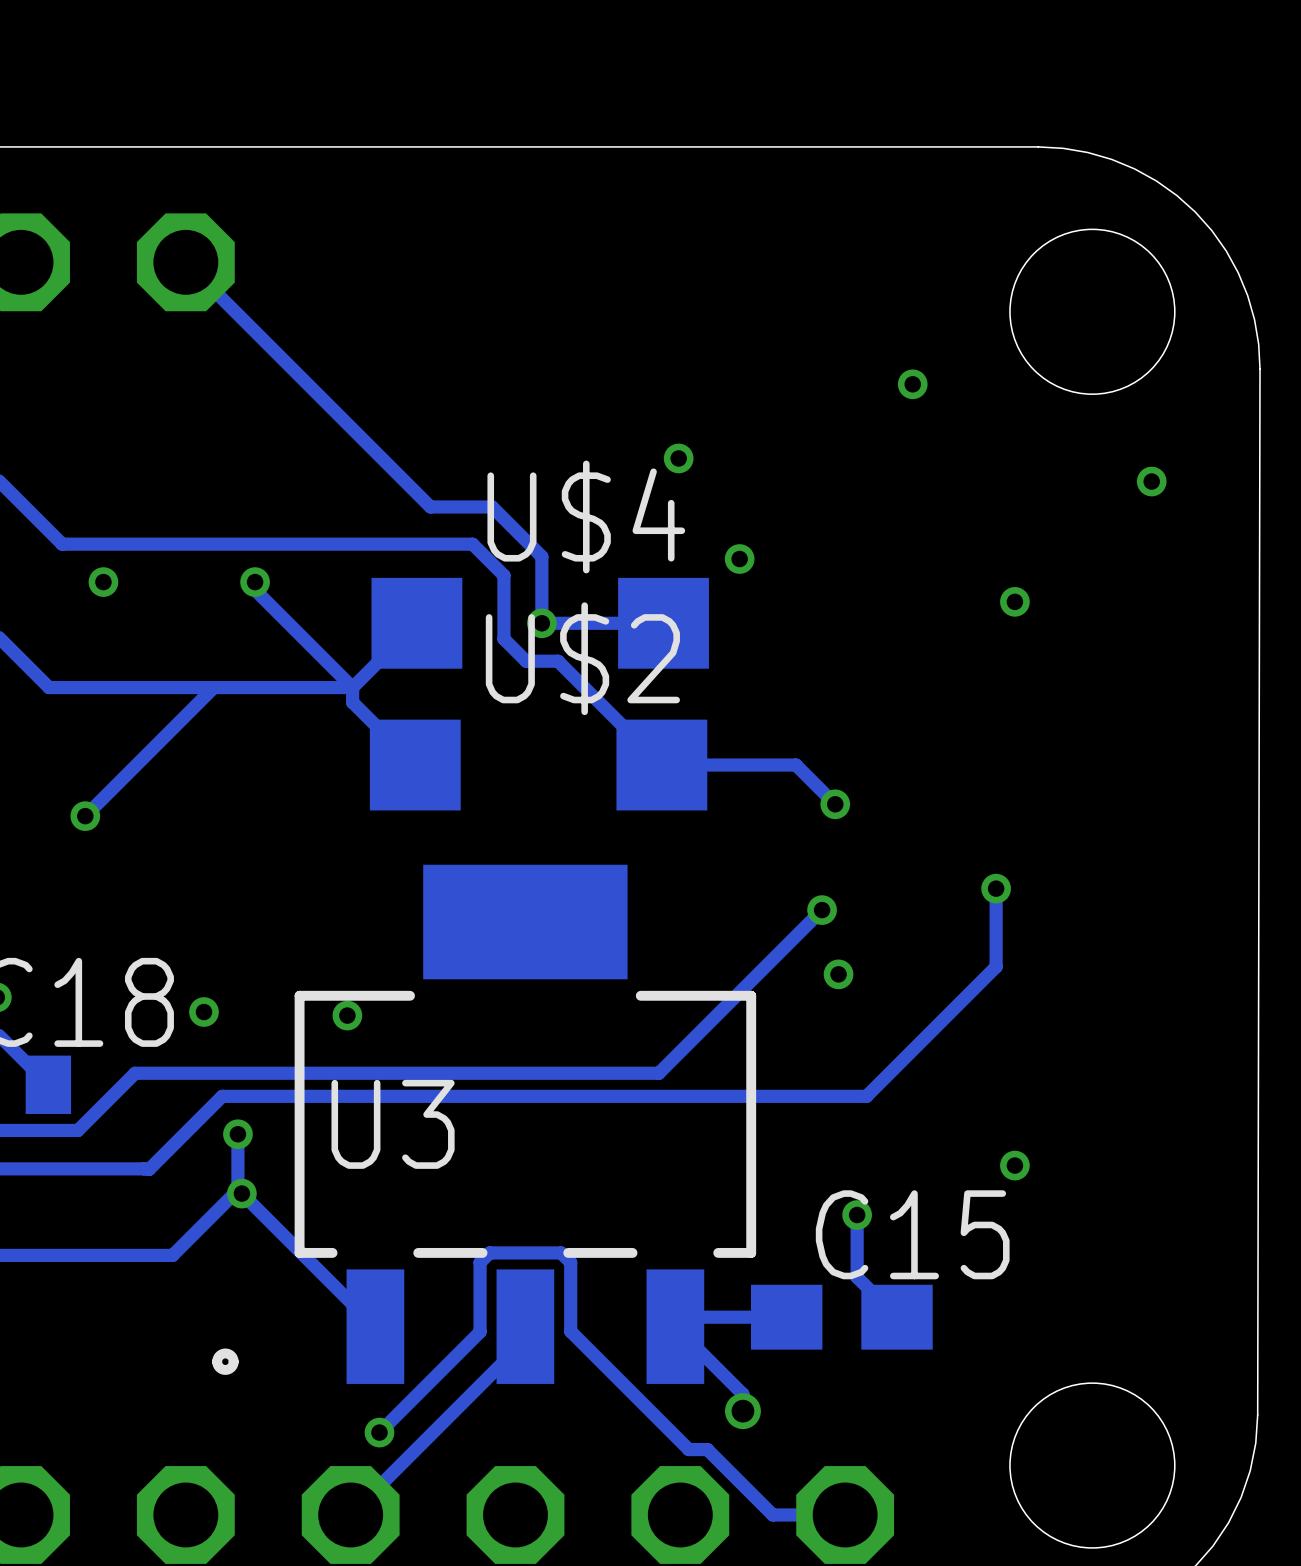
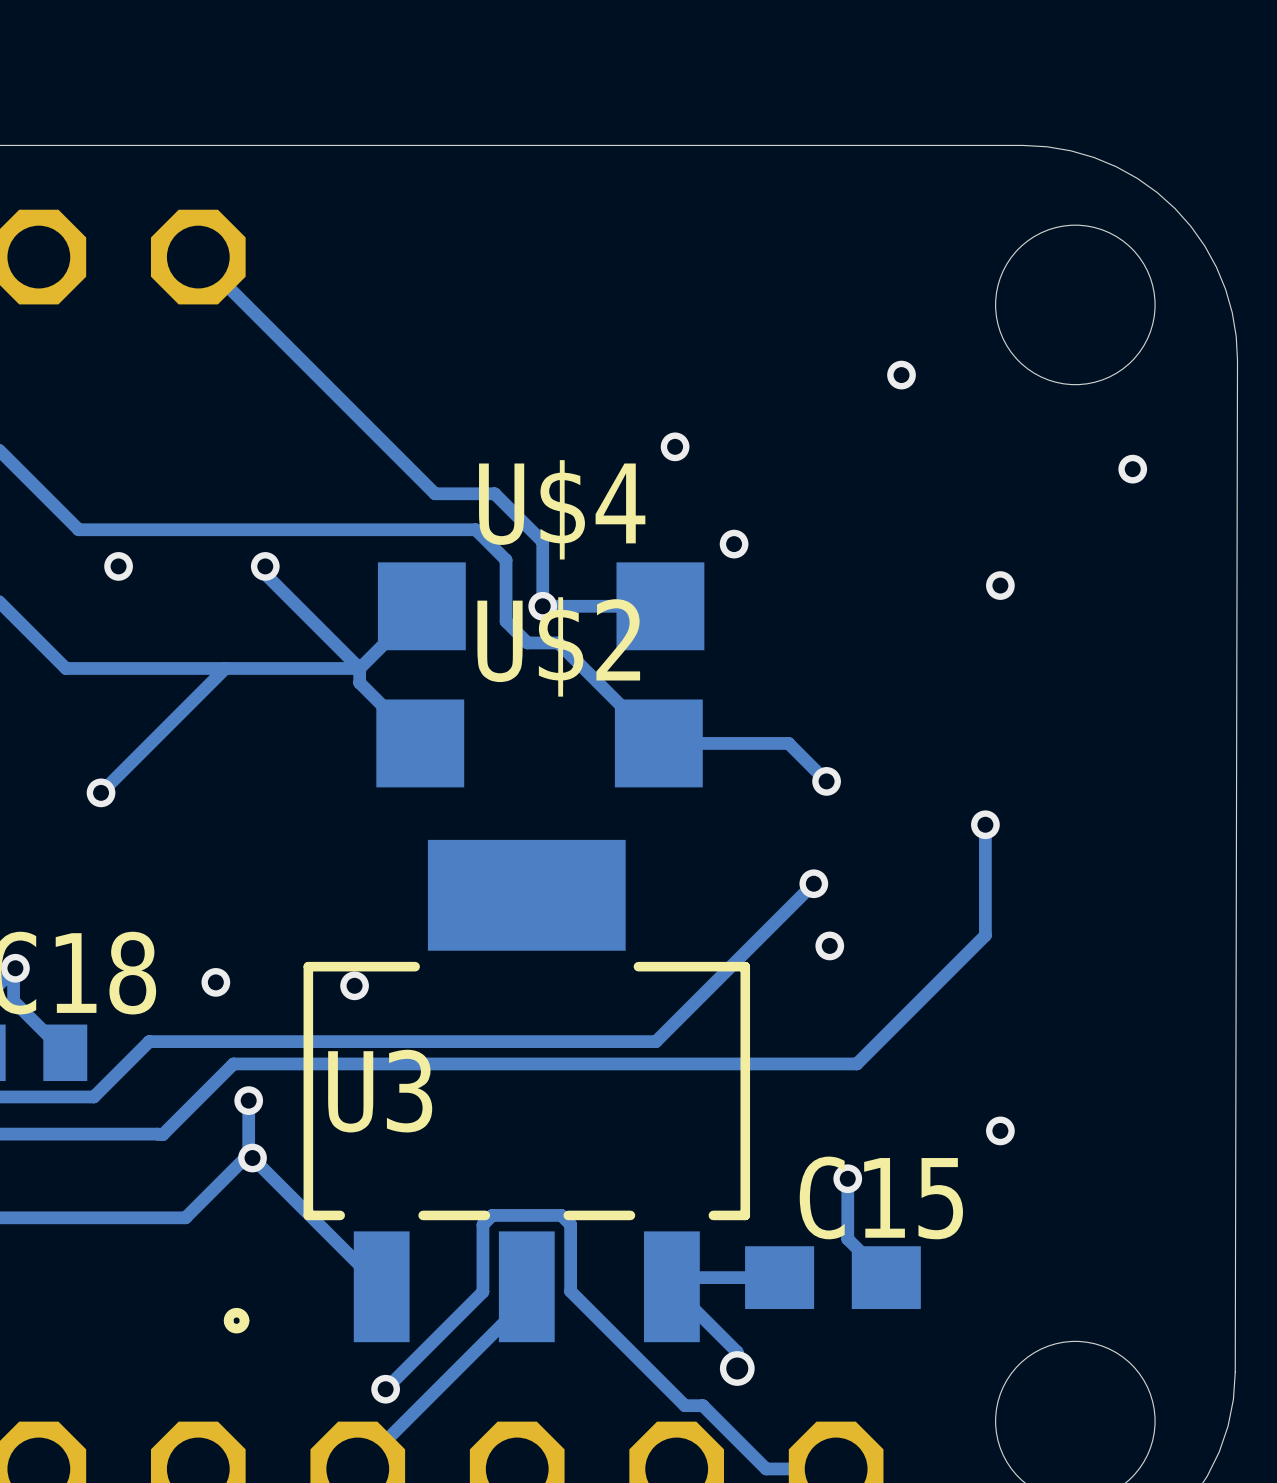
track: (996, 888) (996, 966) -> (985, 824) (985, 935) (982, 938)
via position: (996, 888) -> (985, 824)

